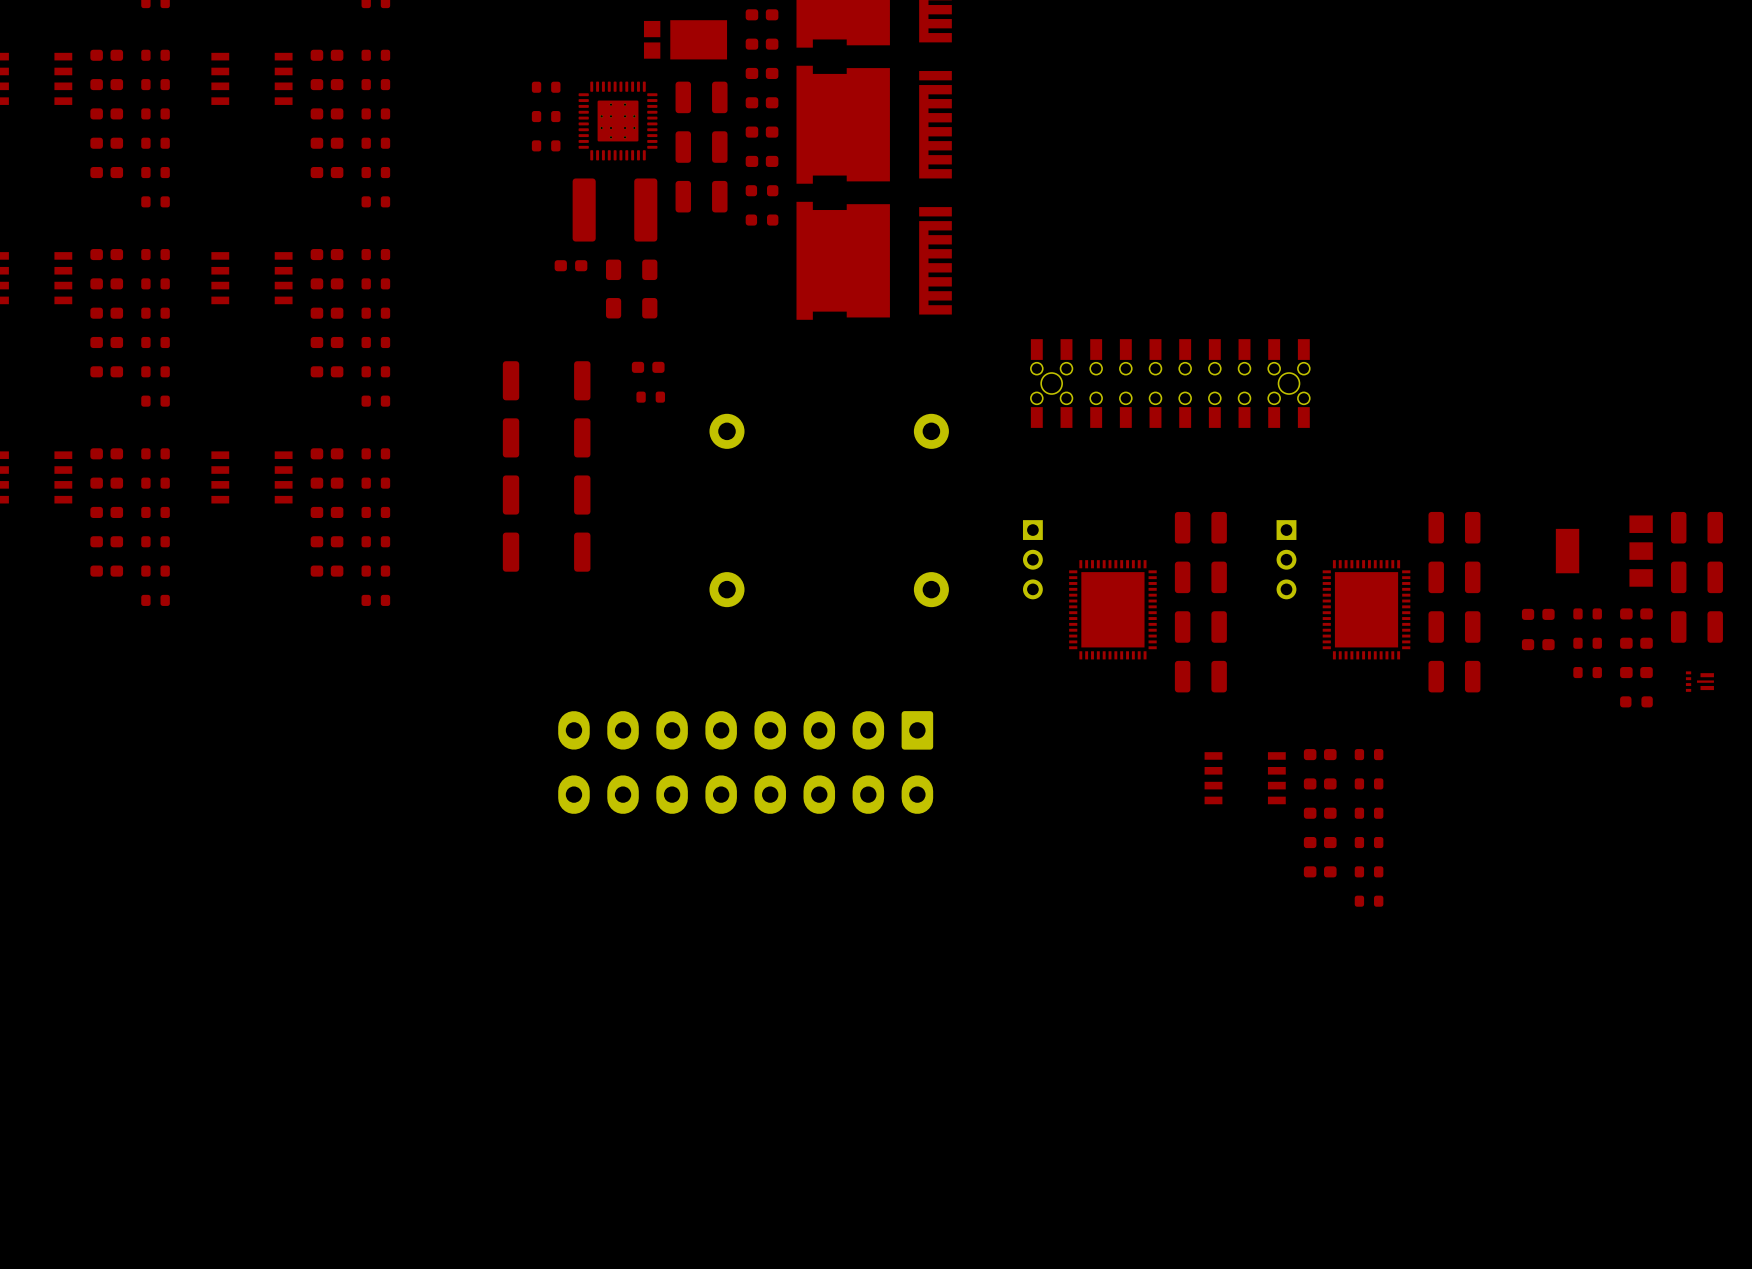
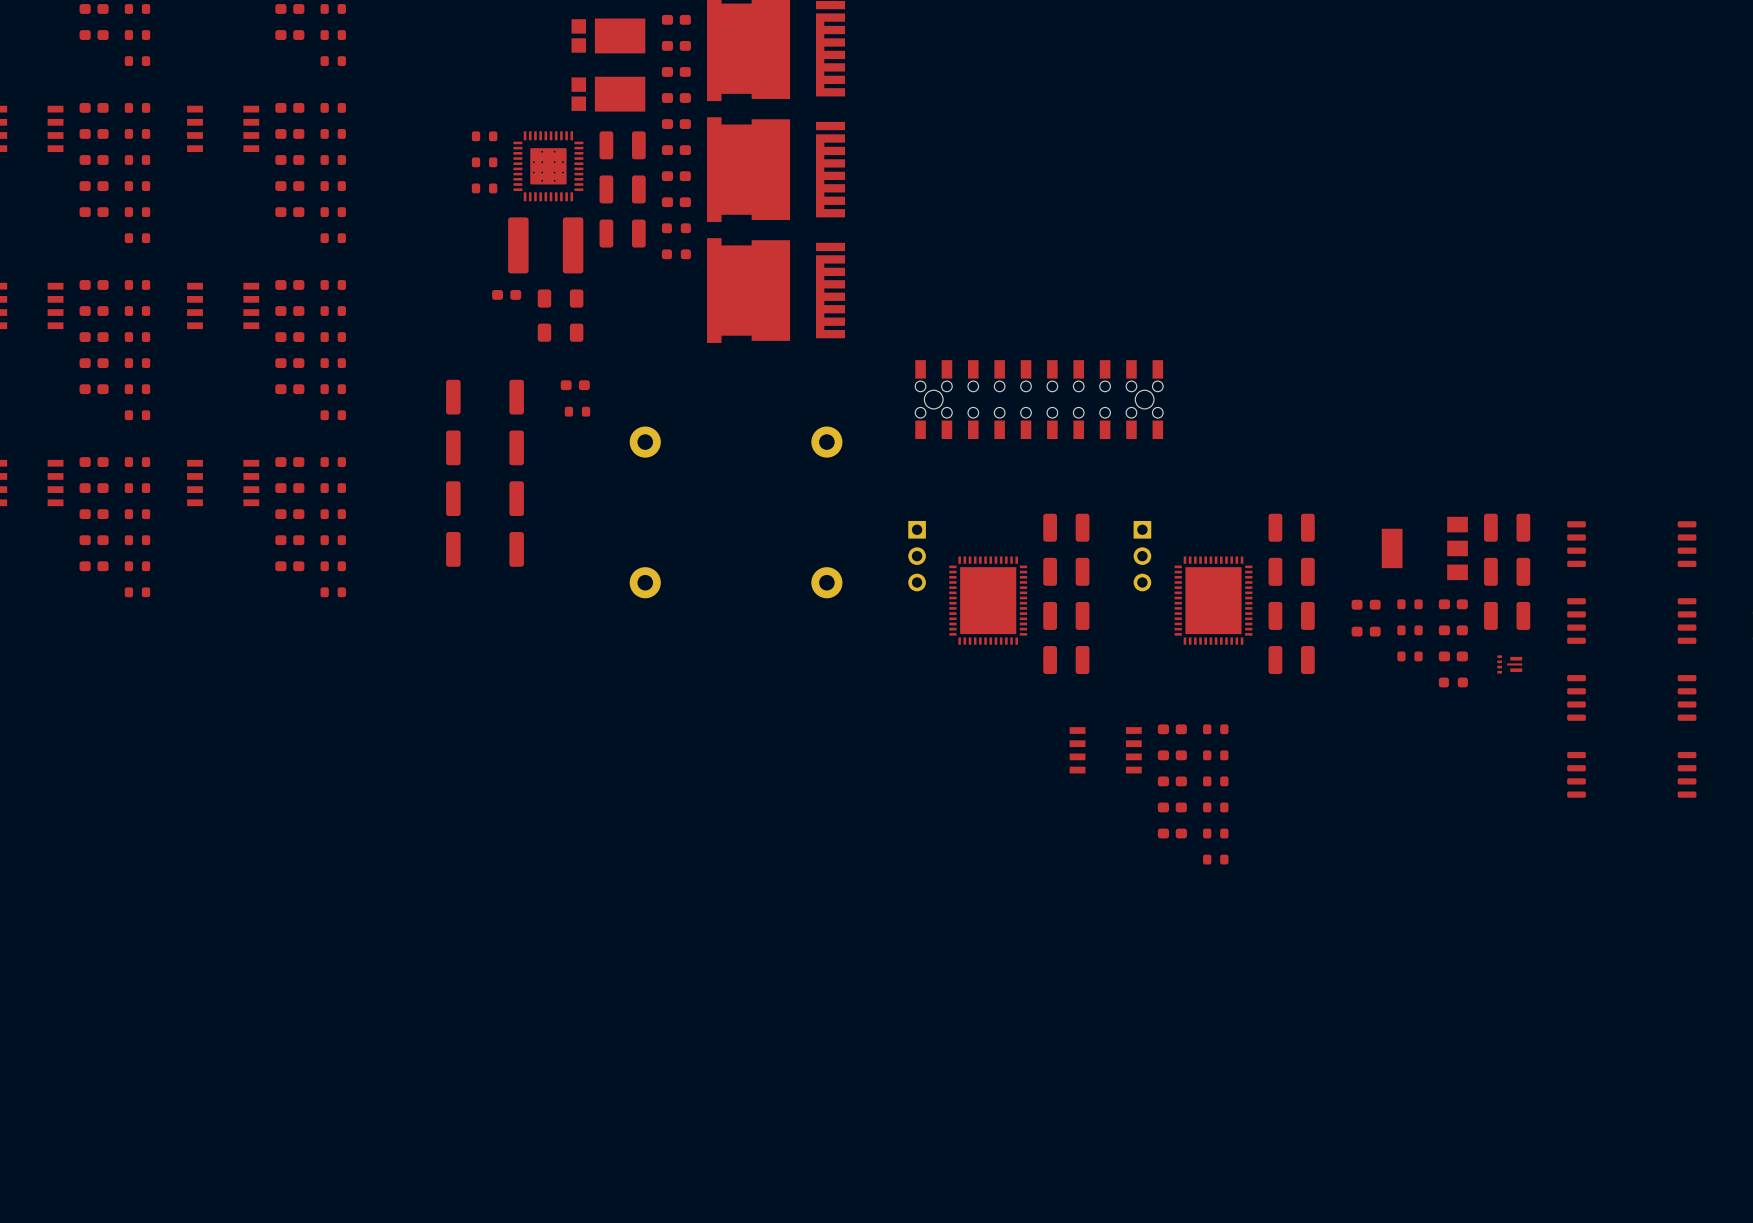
part: (745, 762) -> none

